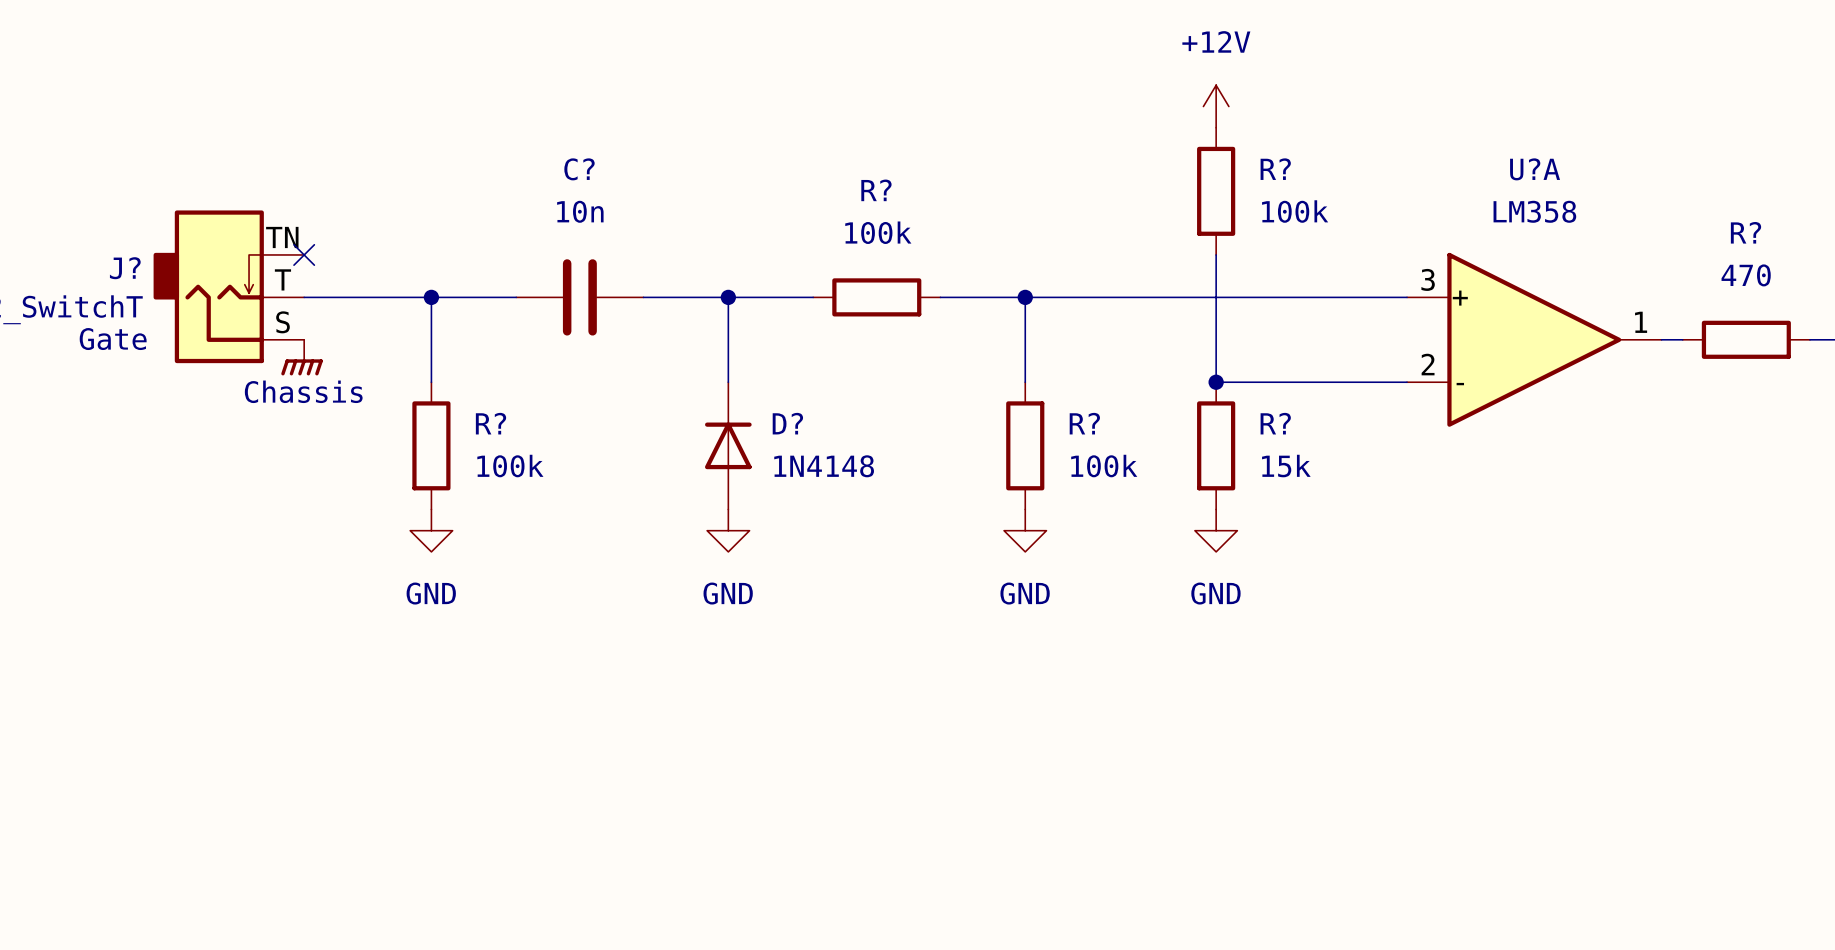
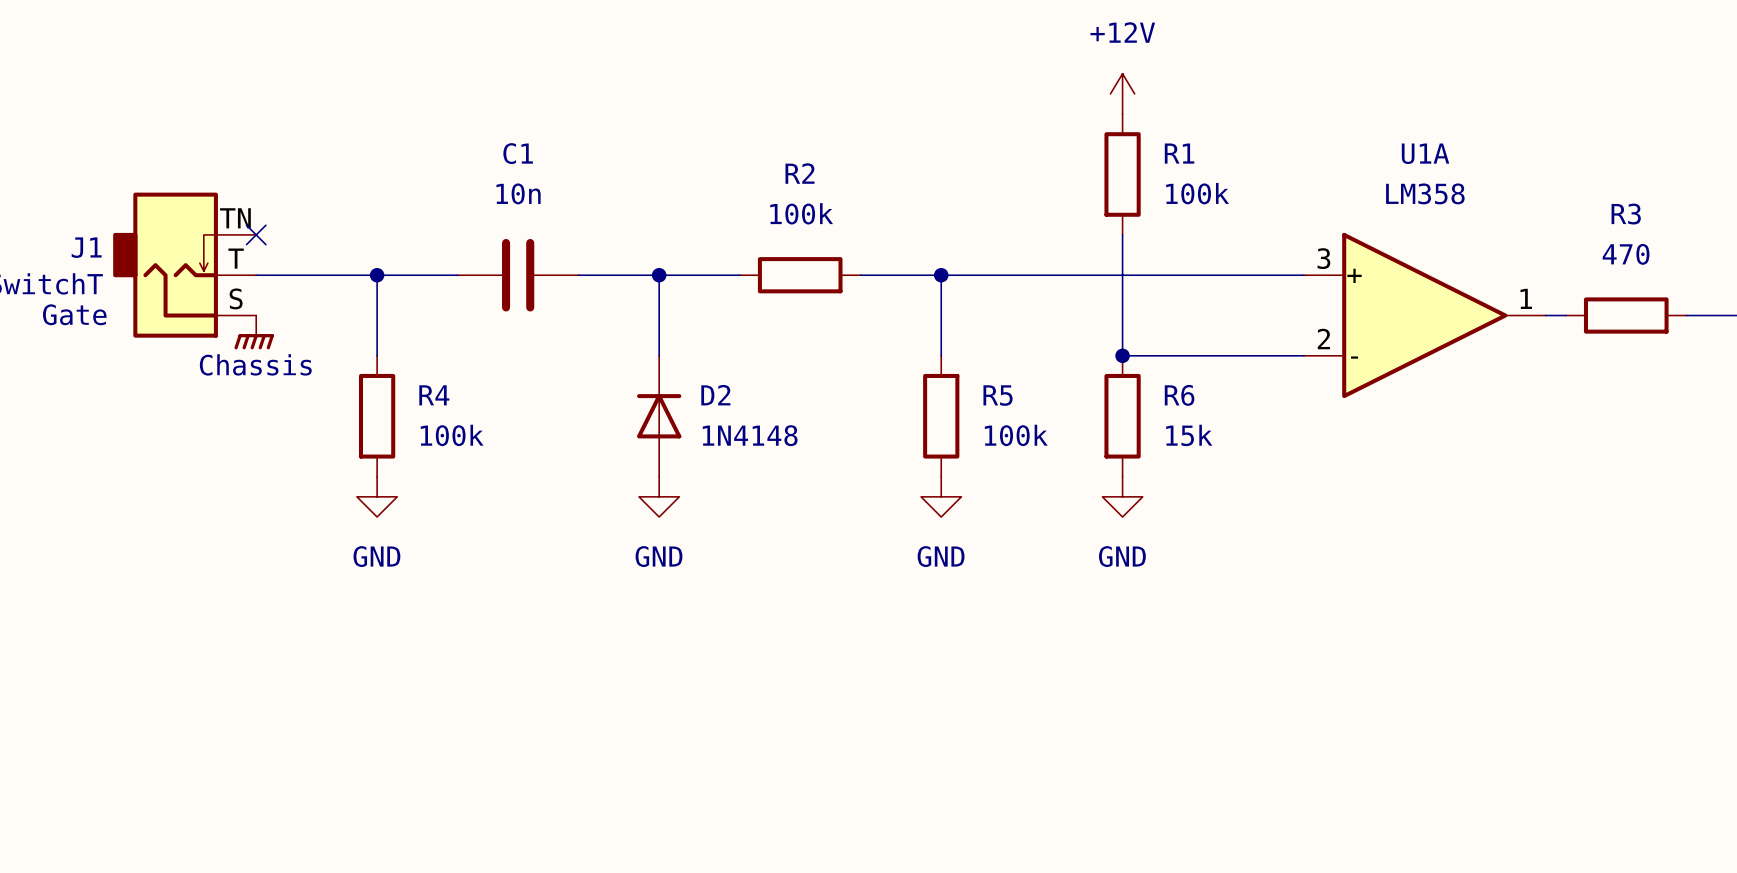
C? name: C? (579, 169) -> C1 (518, 153)
R? name: R? (1275, 169) -> R1 (1179, 153)
U?A name: U?A (1535, 169) -> U1A (1425, 153)
R? name: R? (876, 190) -> R2 (800, 173)
R? name: R? (1746, 232) -> R3 (1626, 214)
J? name: J? (125, 268) -> J1 (86, 247)
R? name: R? (491, 423) -> R4 (434, 395)
D? name: D? (787, 423) -> D2 (715, 395)
R? name: R? (1084, 423) -> R5 (998, 395)
R? name: R? (1275, 423) -> R6 (1179, 395)

